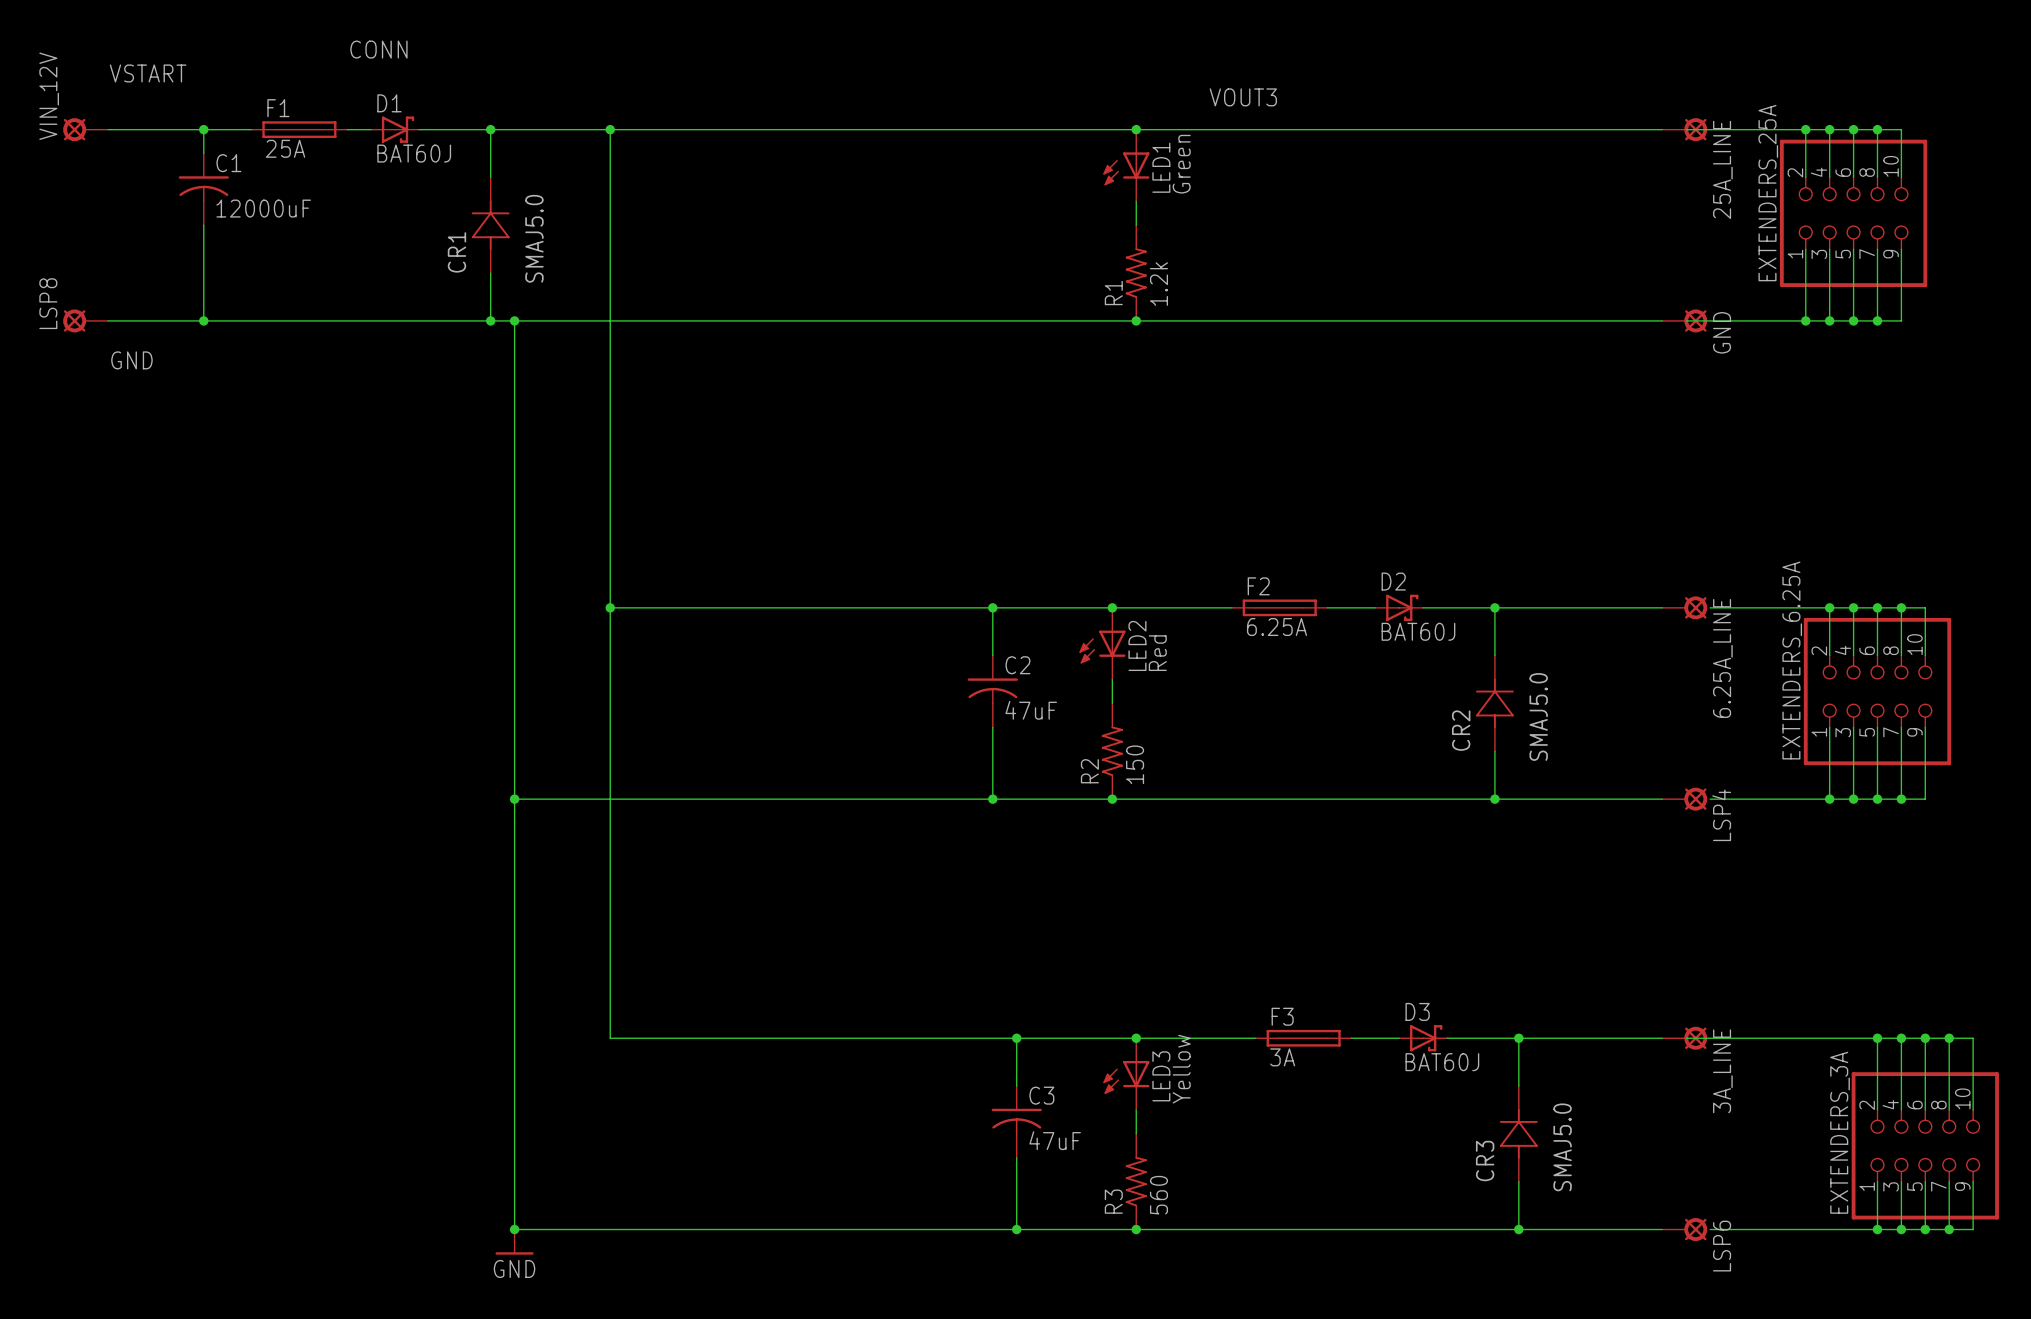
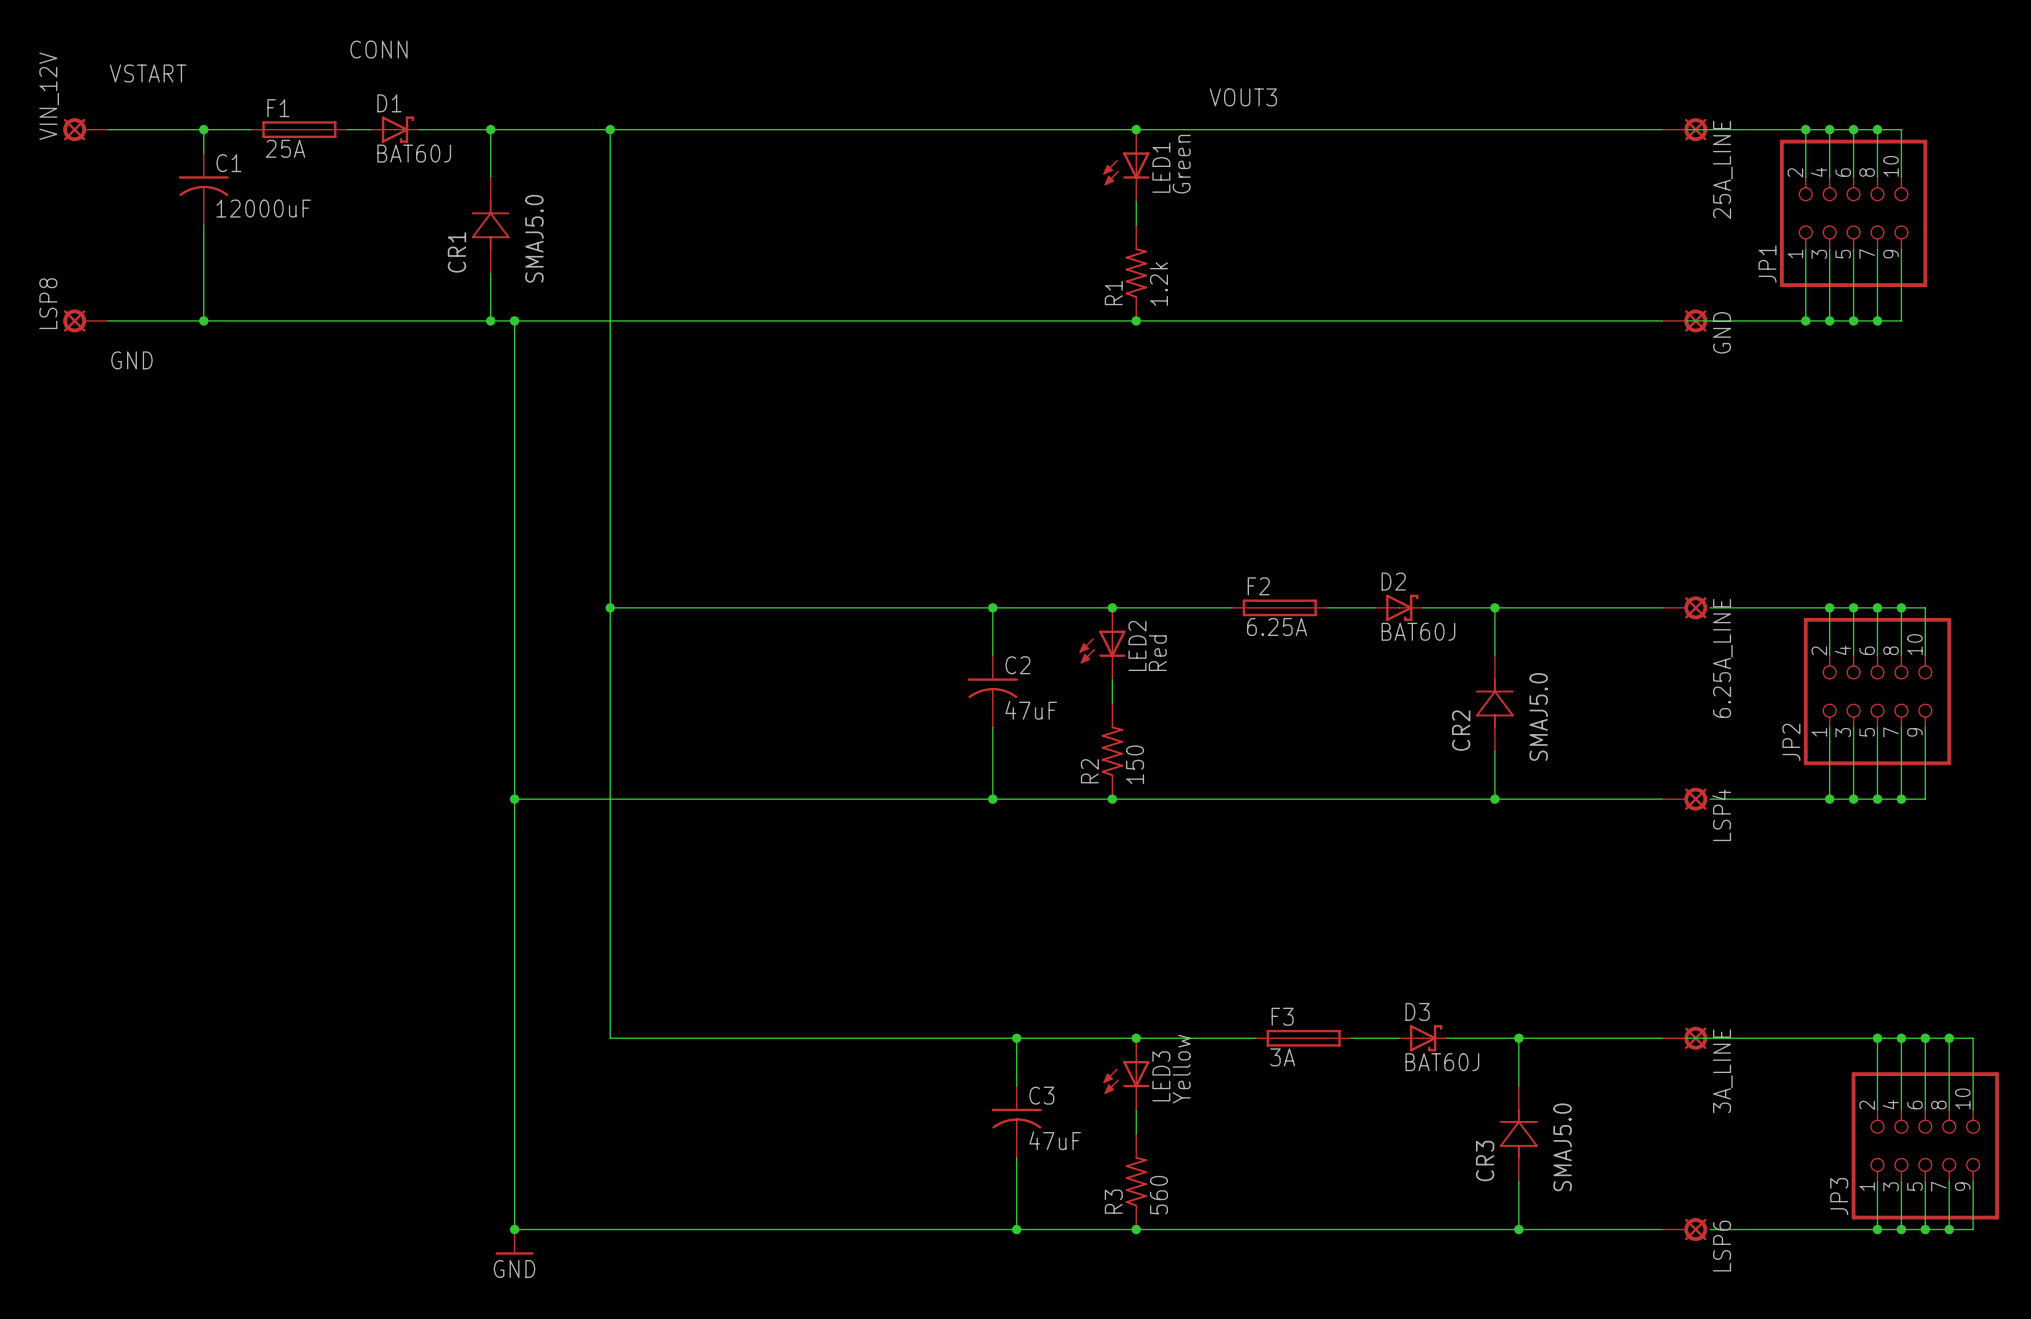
EXTENDERS_25A name: EXTENDERS_25A (1768, 193) -> JP1 (1767, 264)
EXTENDERS_6.25A name: EXTENDERS_6.25A (1792, 660) -> JP2 (1791, 742)
EXTENDERS_3A name: EXTENDERS_3A (1840, 1132) -> JP3 (1839, 1196)

